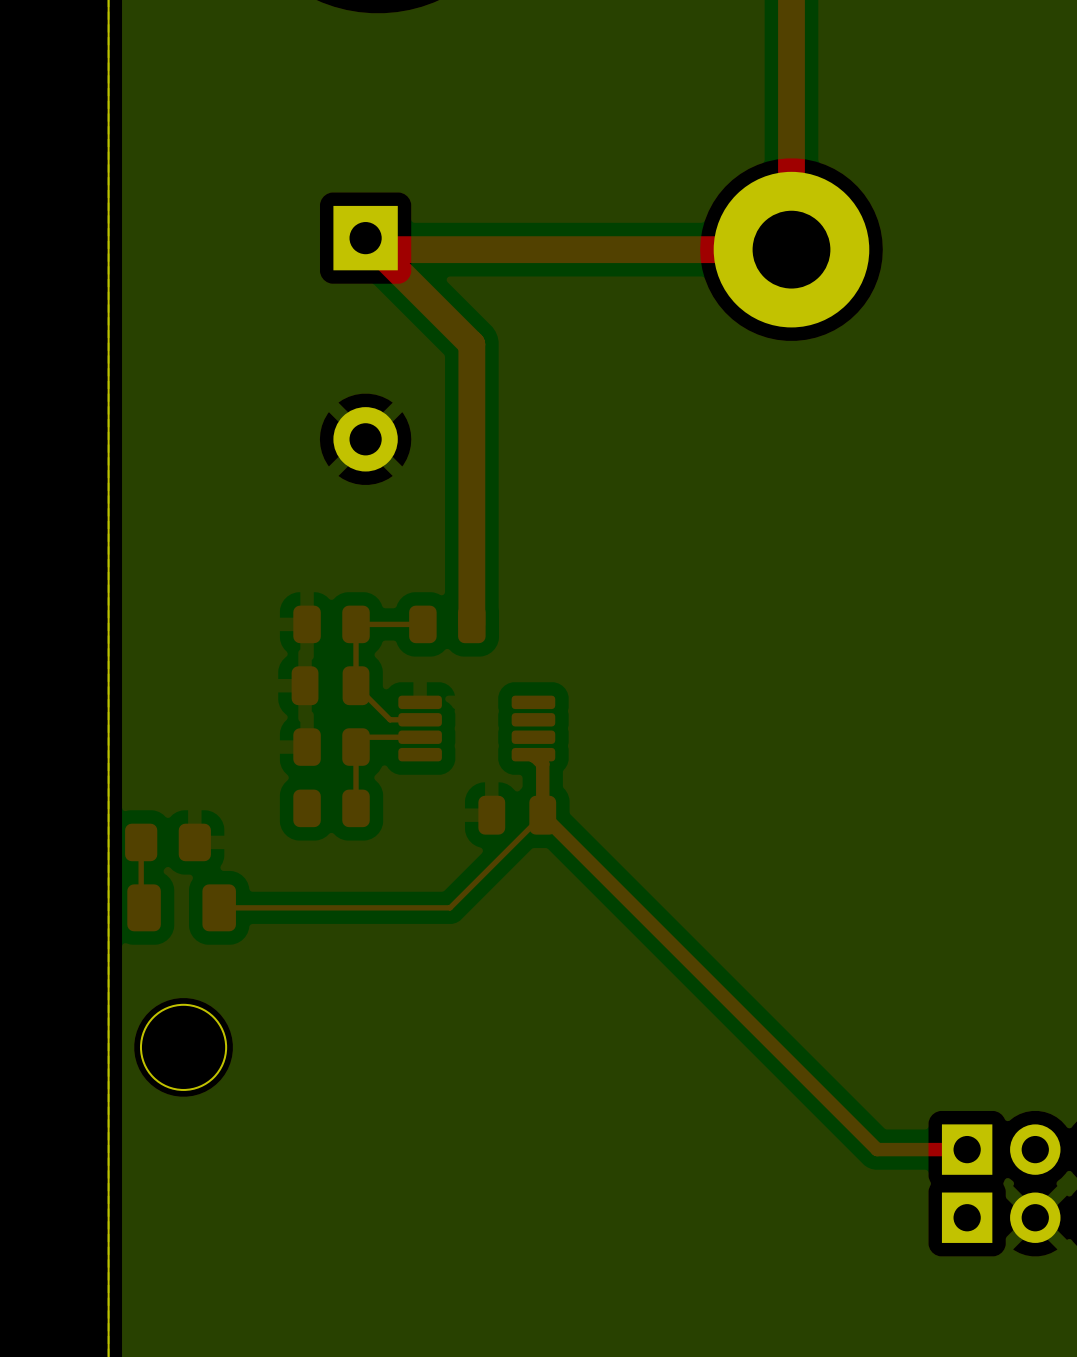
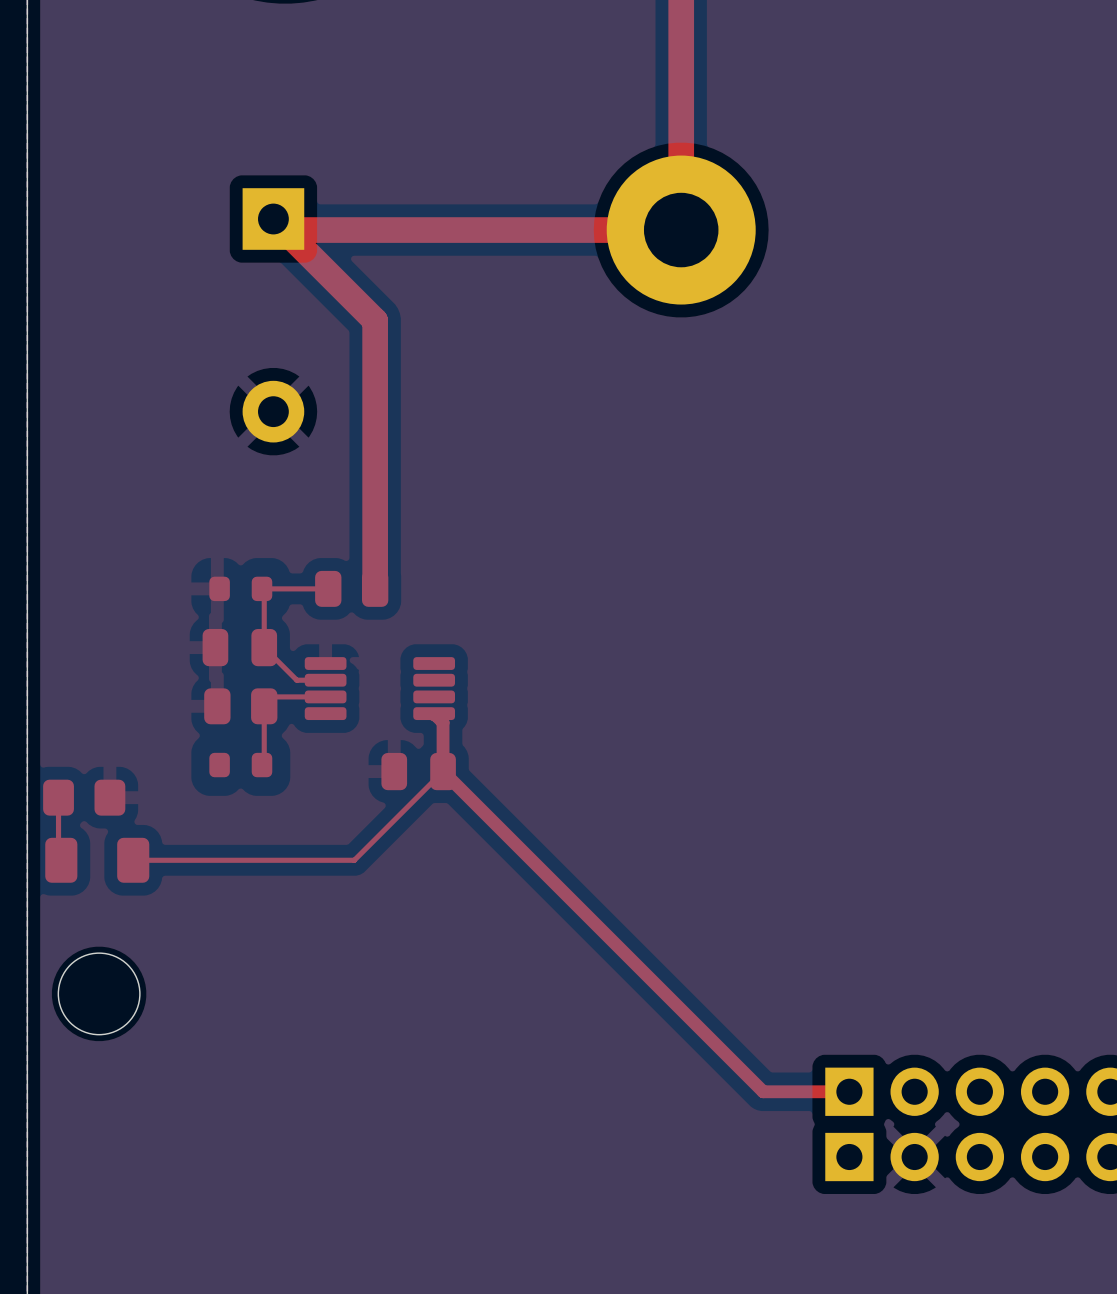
part footprint: [293, 605, 370, 644] -> [209, 576, 273, 602]
part footprint: [293, 789, 370, 828] -> [209, 752, 273, 778]

